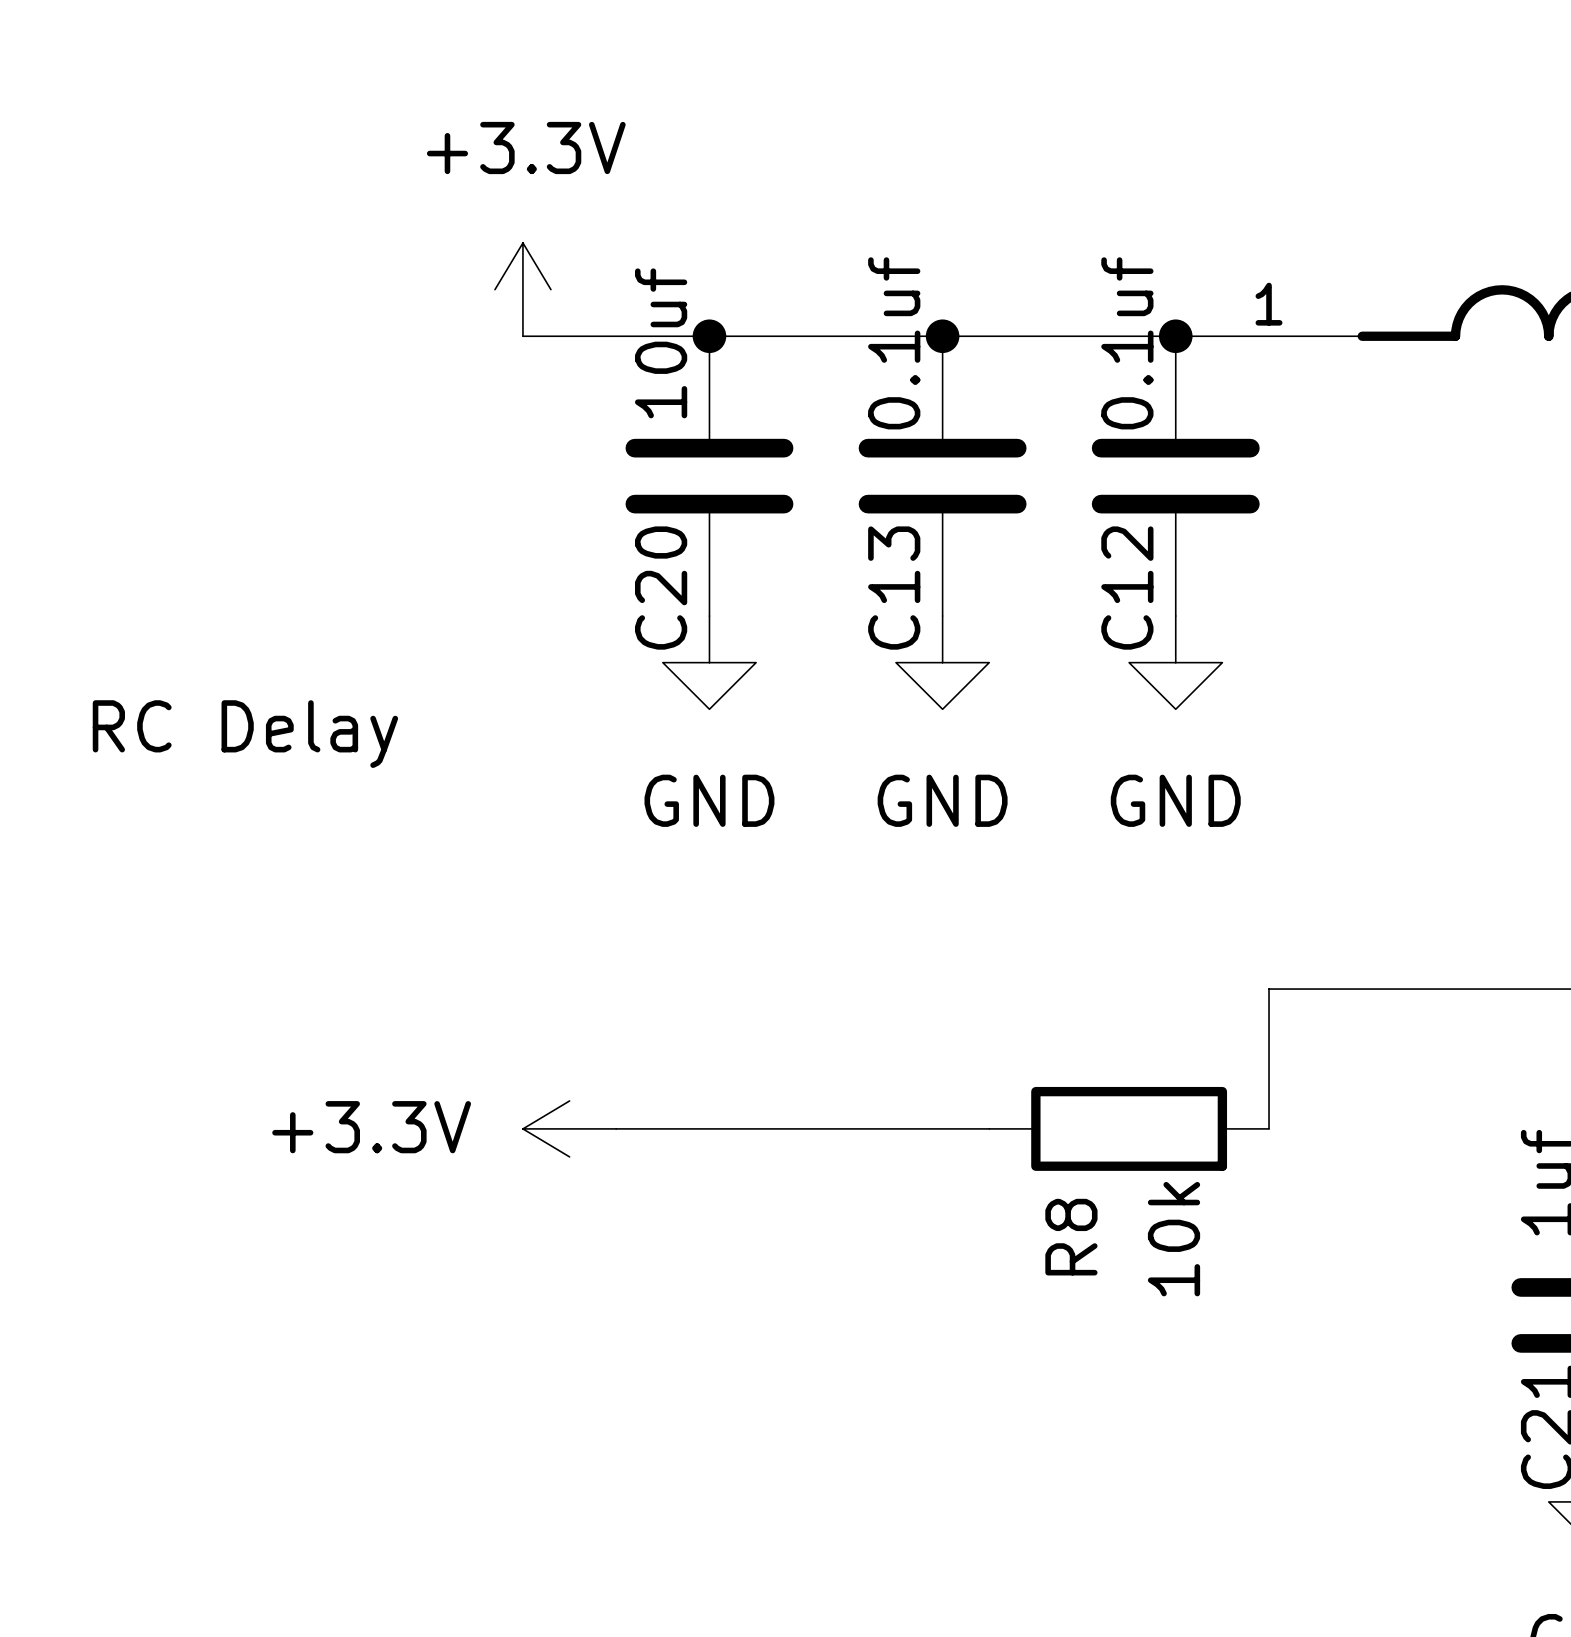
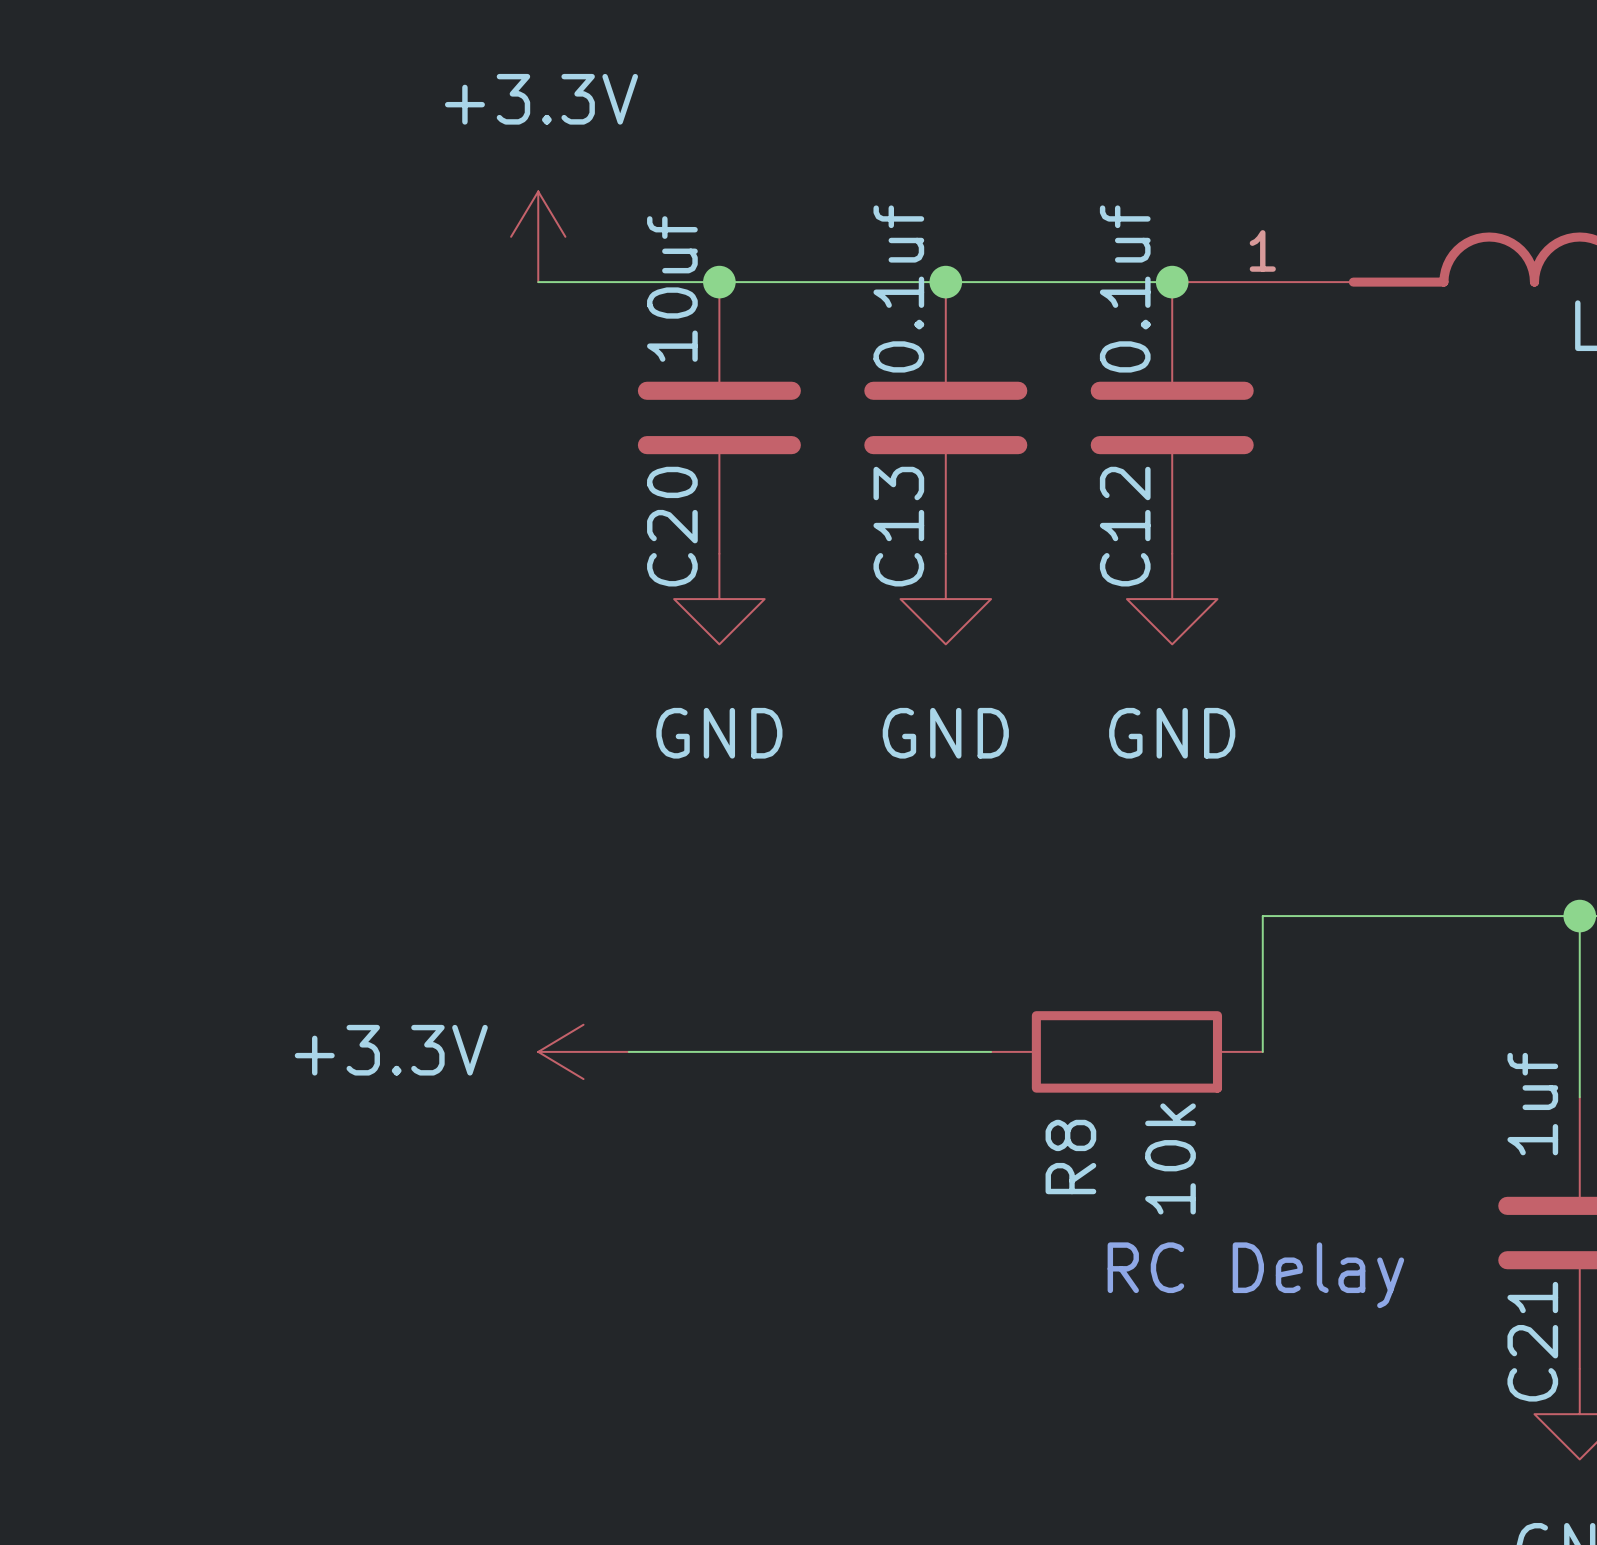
text: RC Delay (245, 734) -> none
text: none -> RC Delay (1255, 1275)

